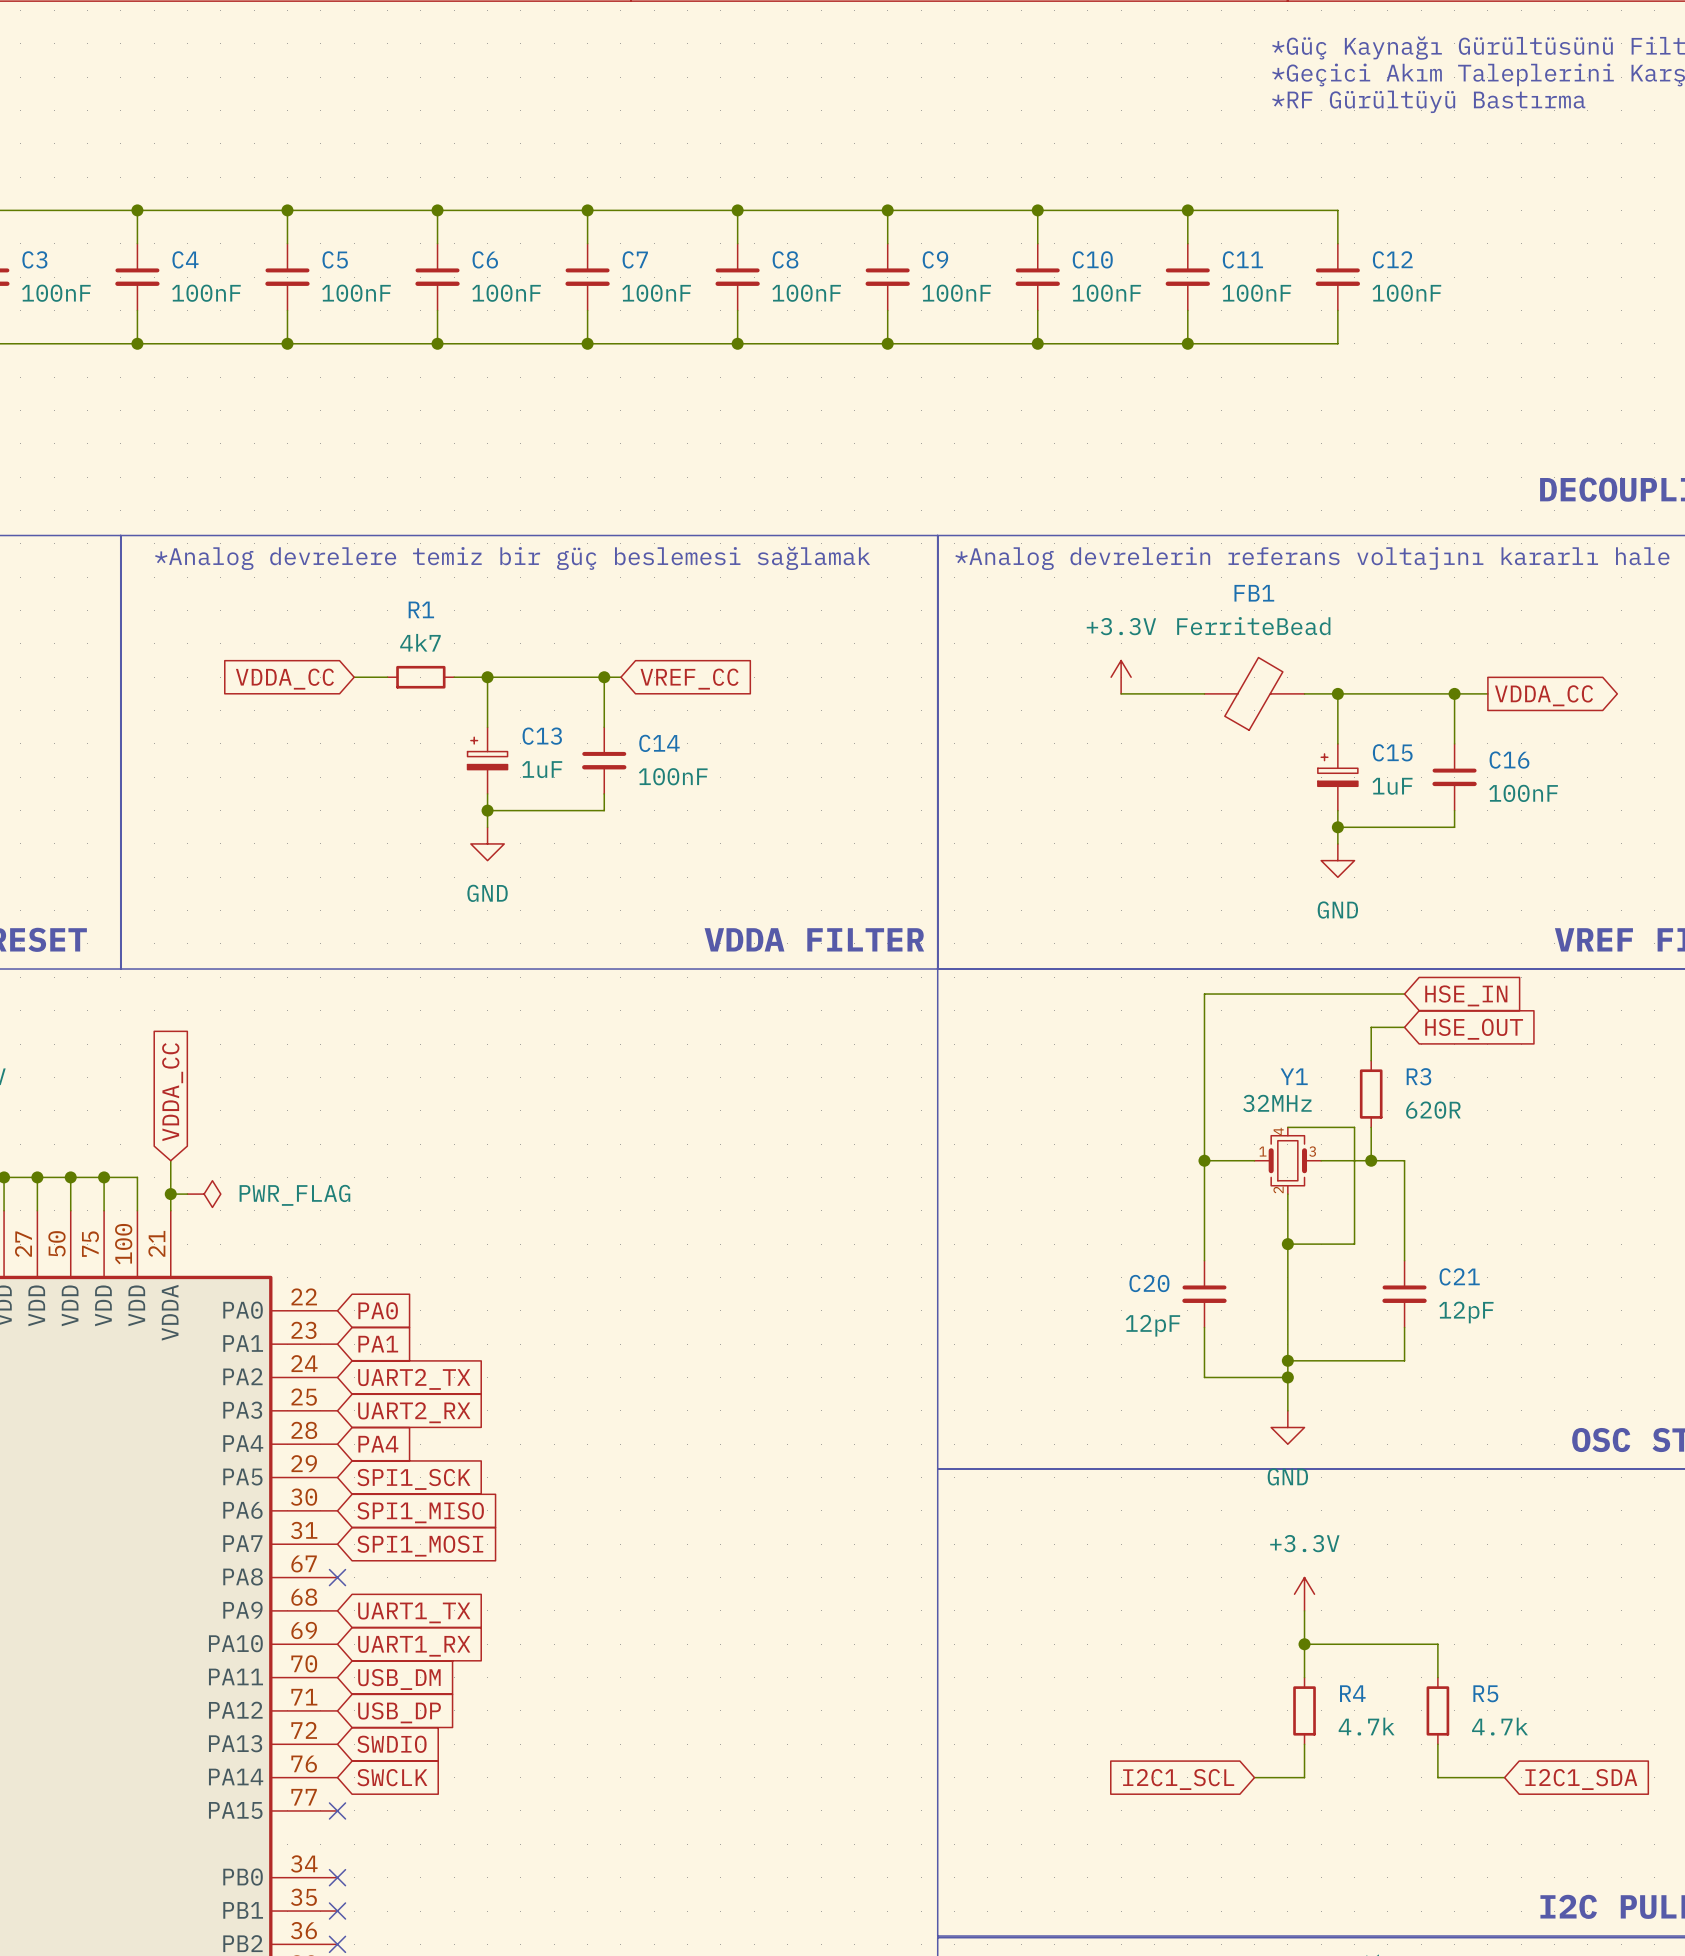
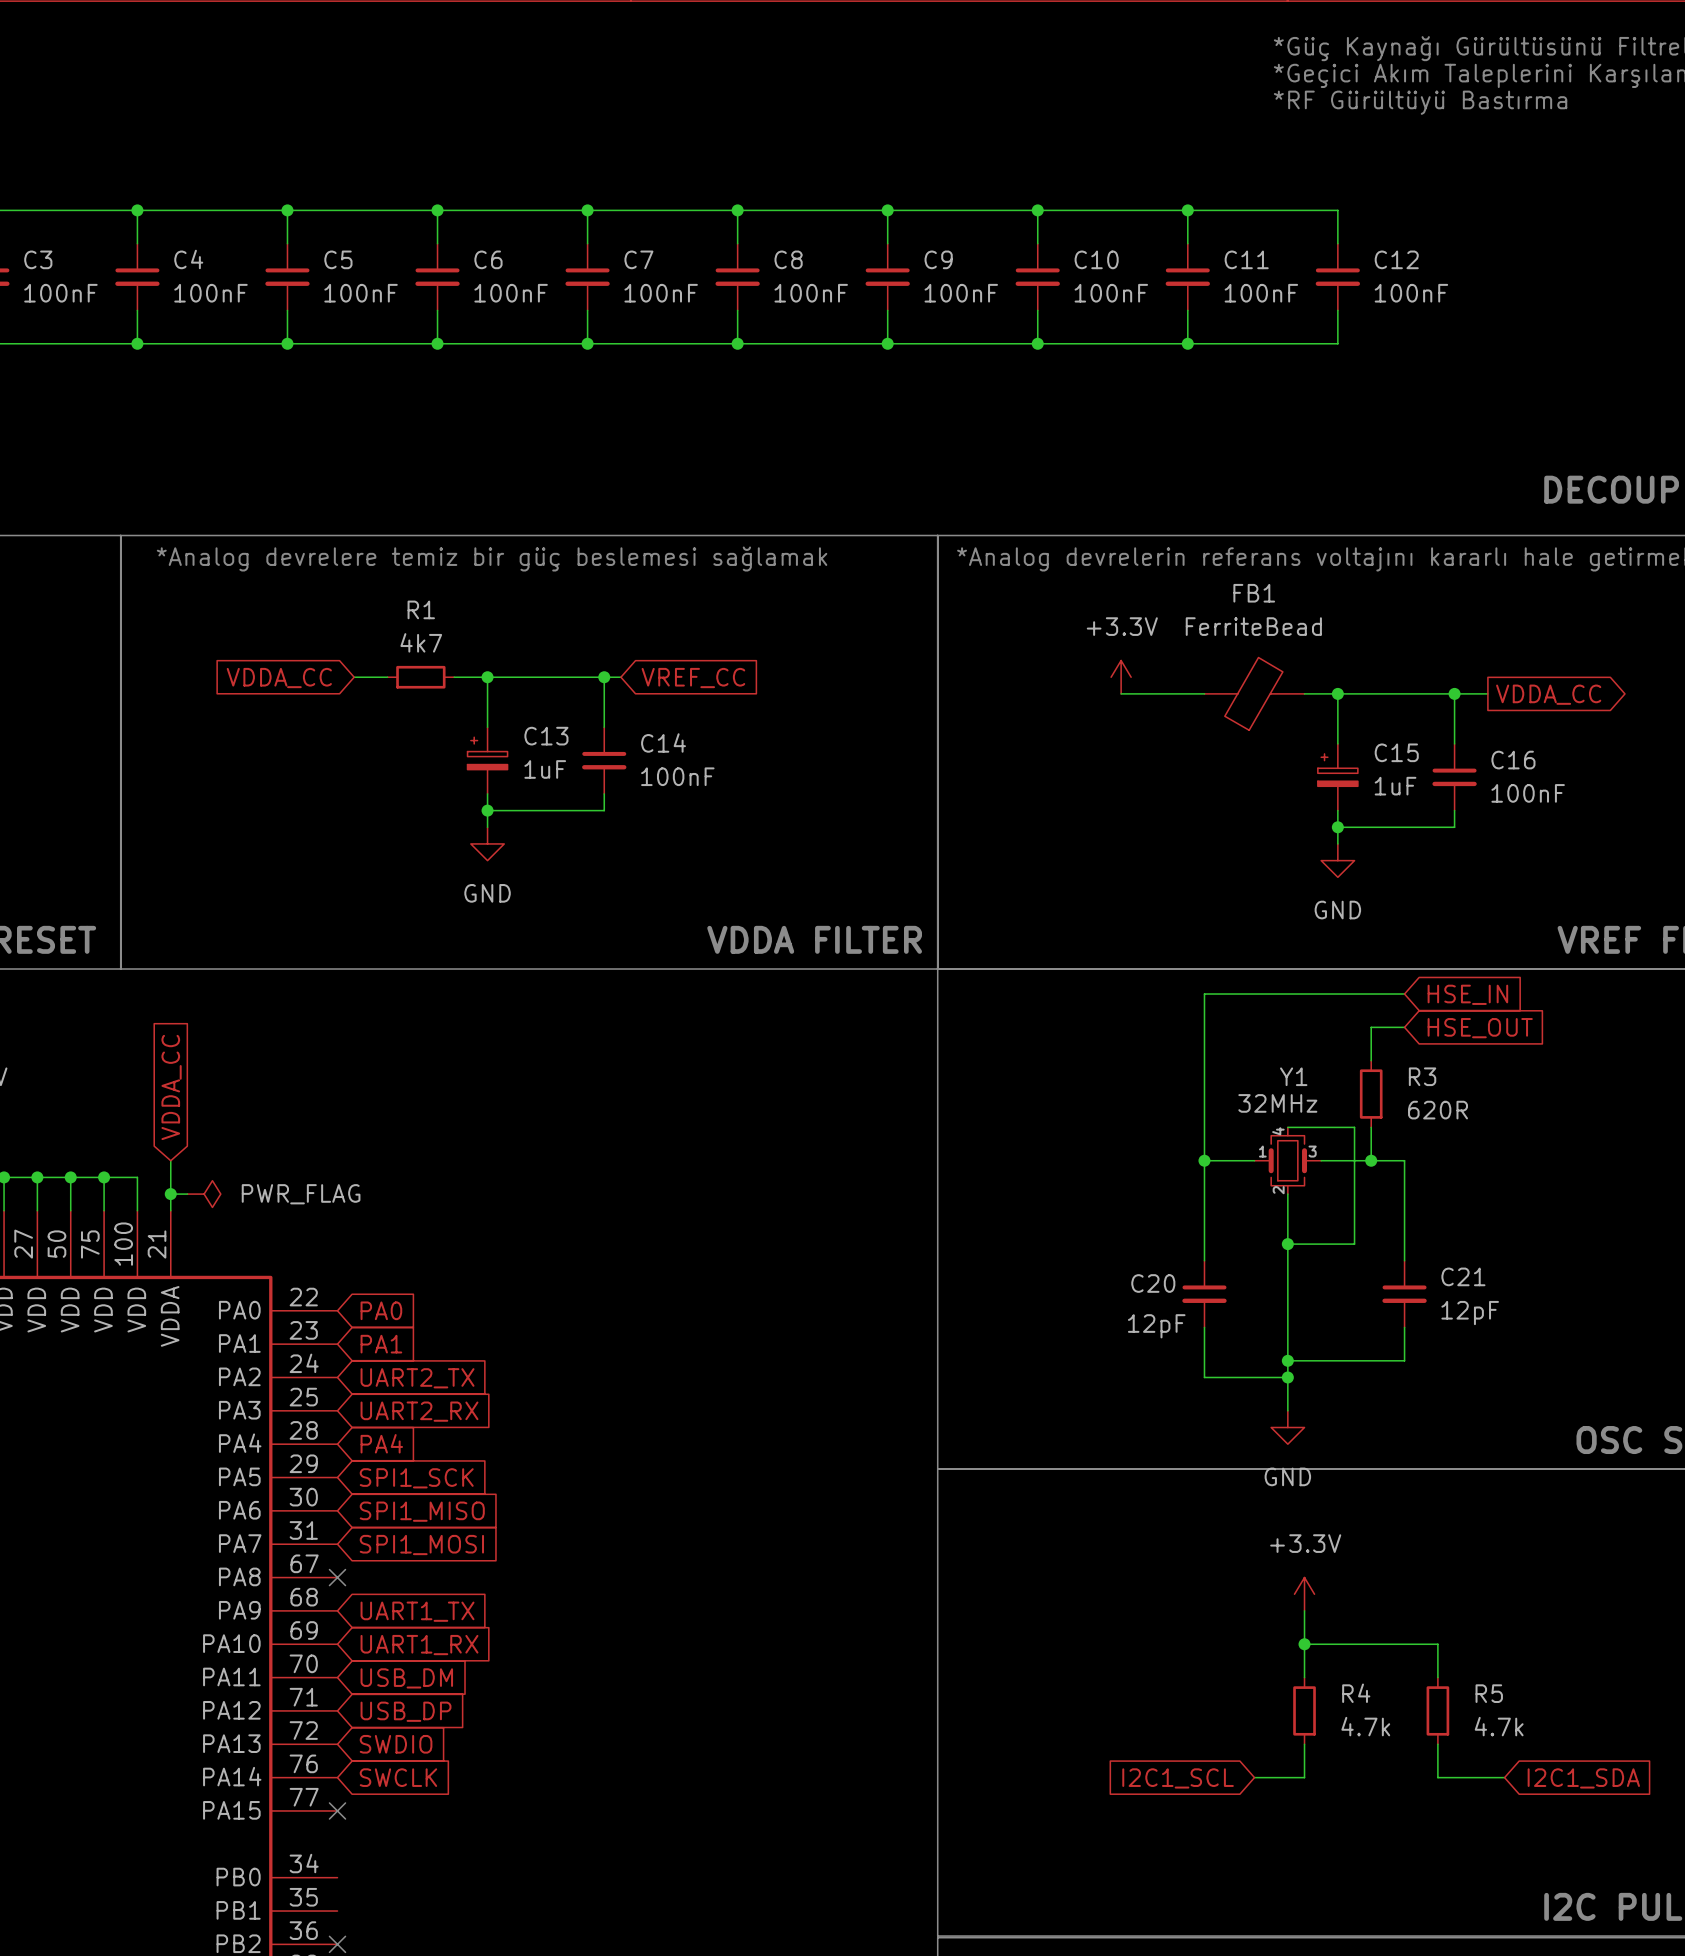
no-connect mark: (337, 1877) -> none
no-connect mark: (337, 1911) -> none

